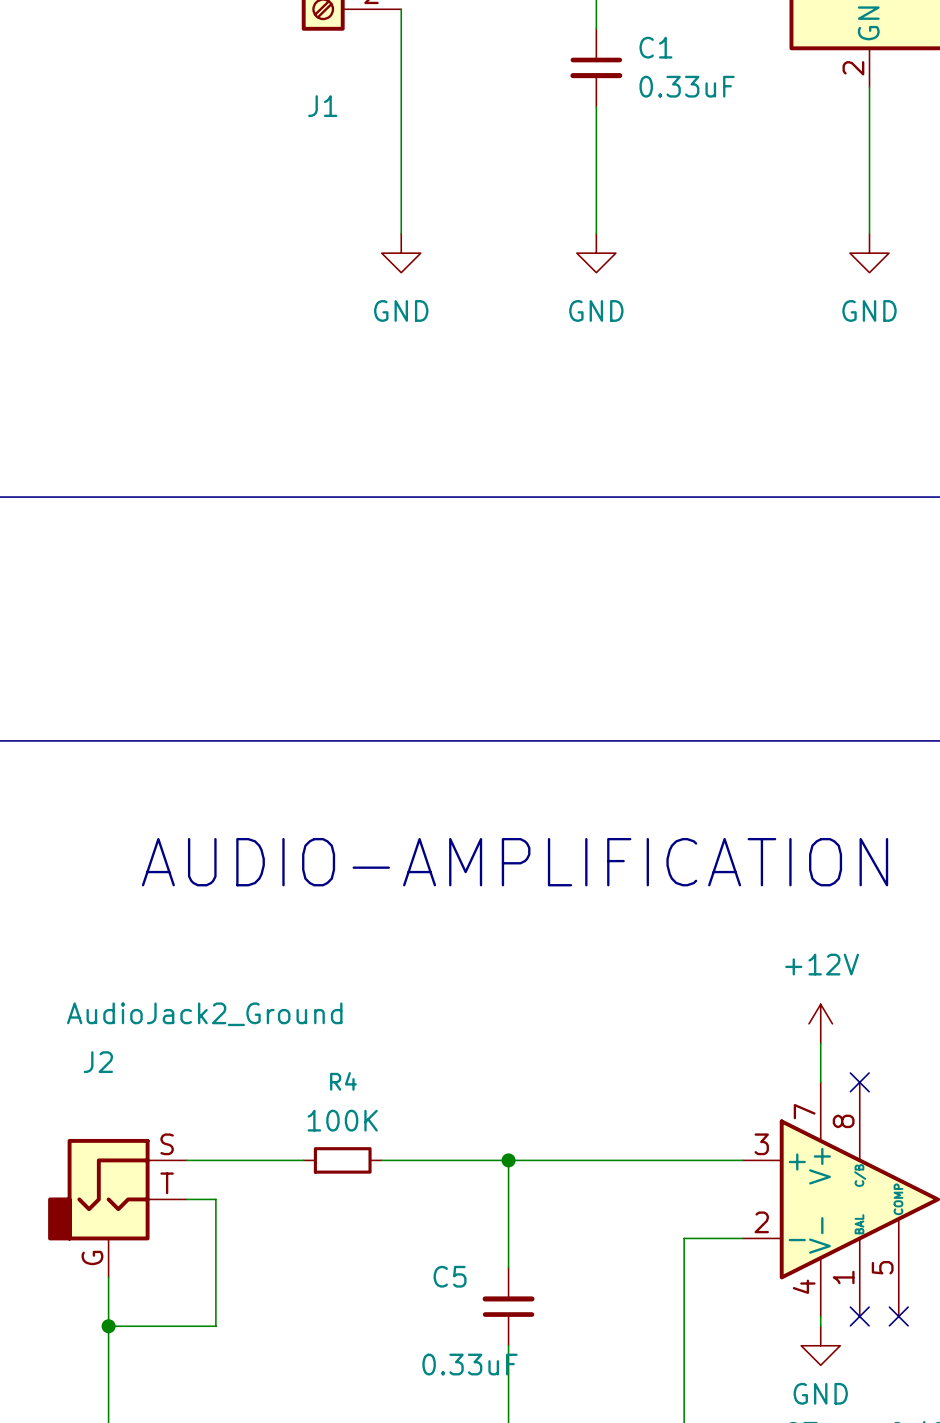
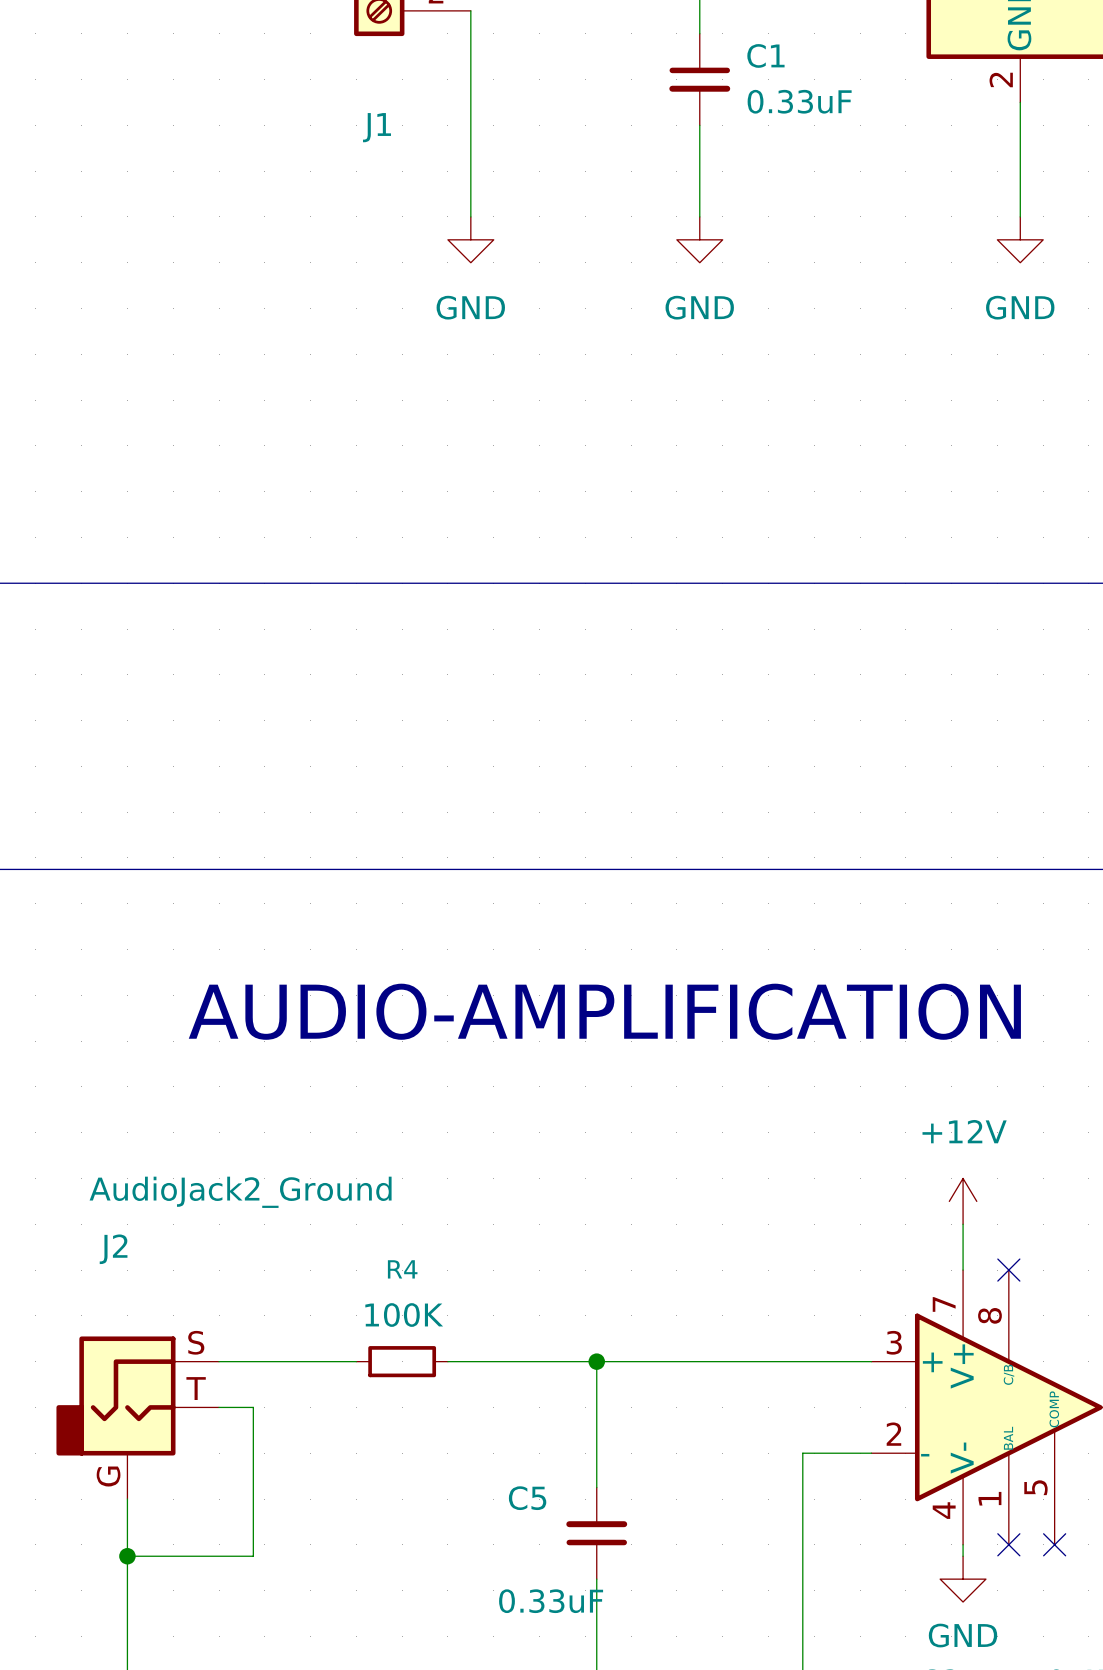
wire: (401, 184) (401, 233) -> none
wire: (596, 184) (596, 233) -> none
wire: (869, 184) (869, 233) -> none
power symbol position: GND (401, 253) -> GND (470, 239)
power symbol position: GND (596, 253) -> GND (699, 239)
power symbol position: GND (869, 253) -> GND (1020, 239)

